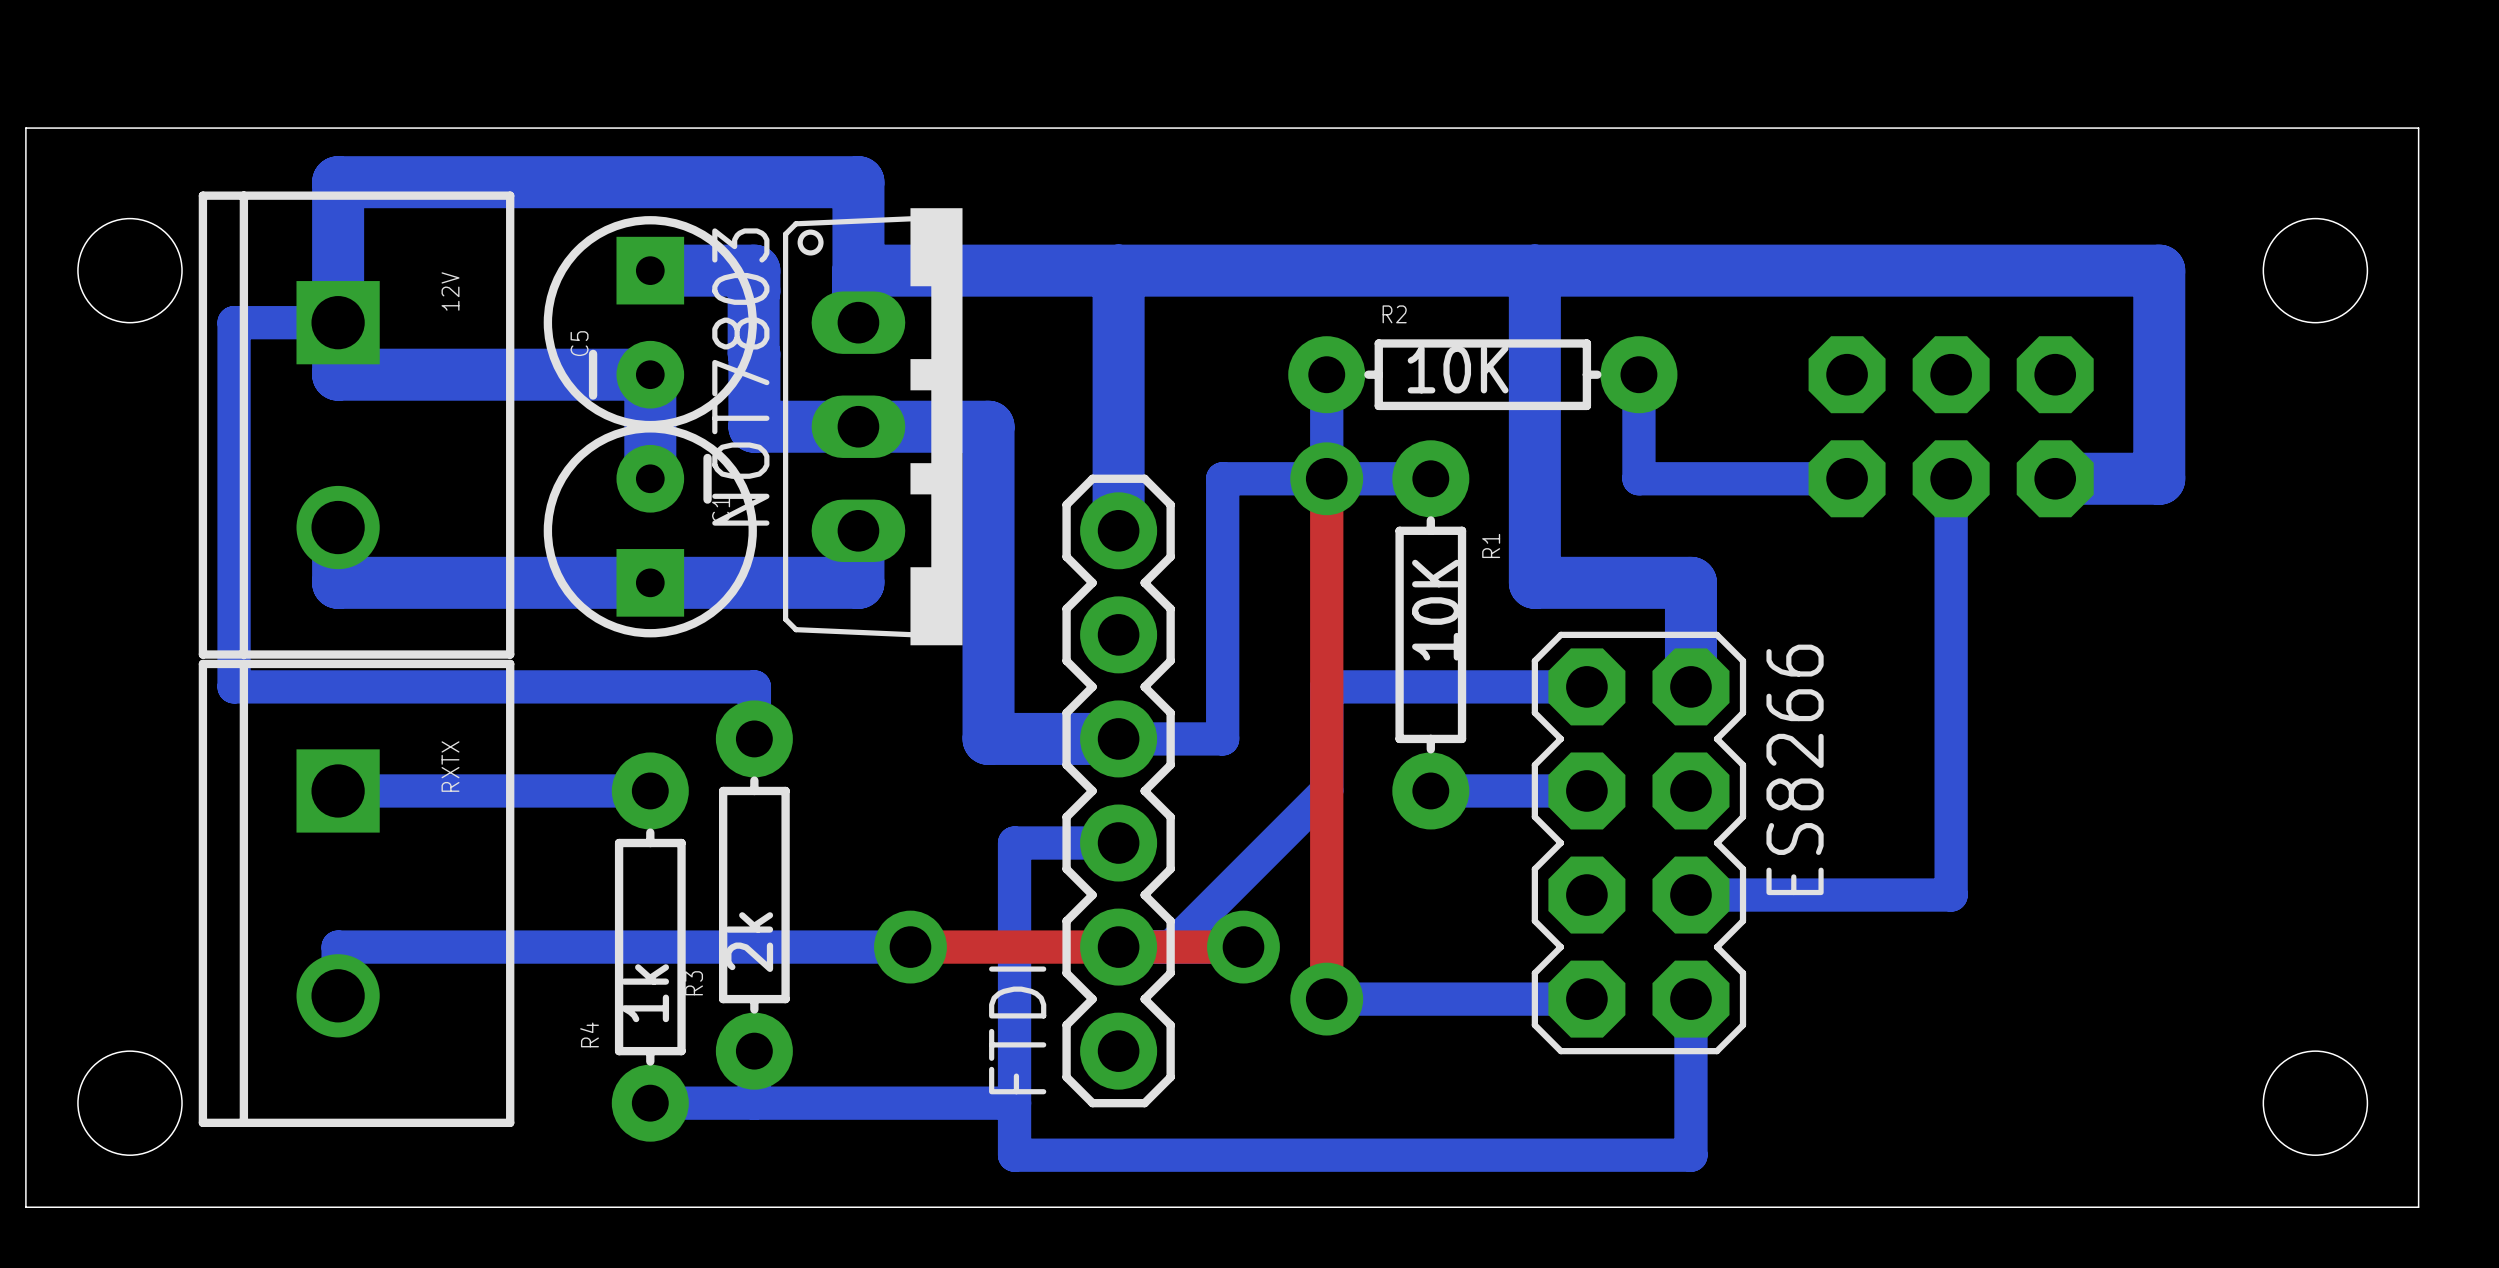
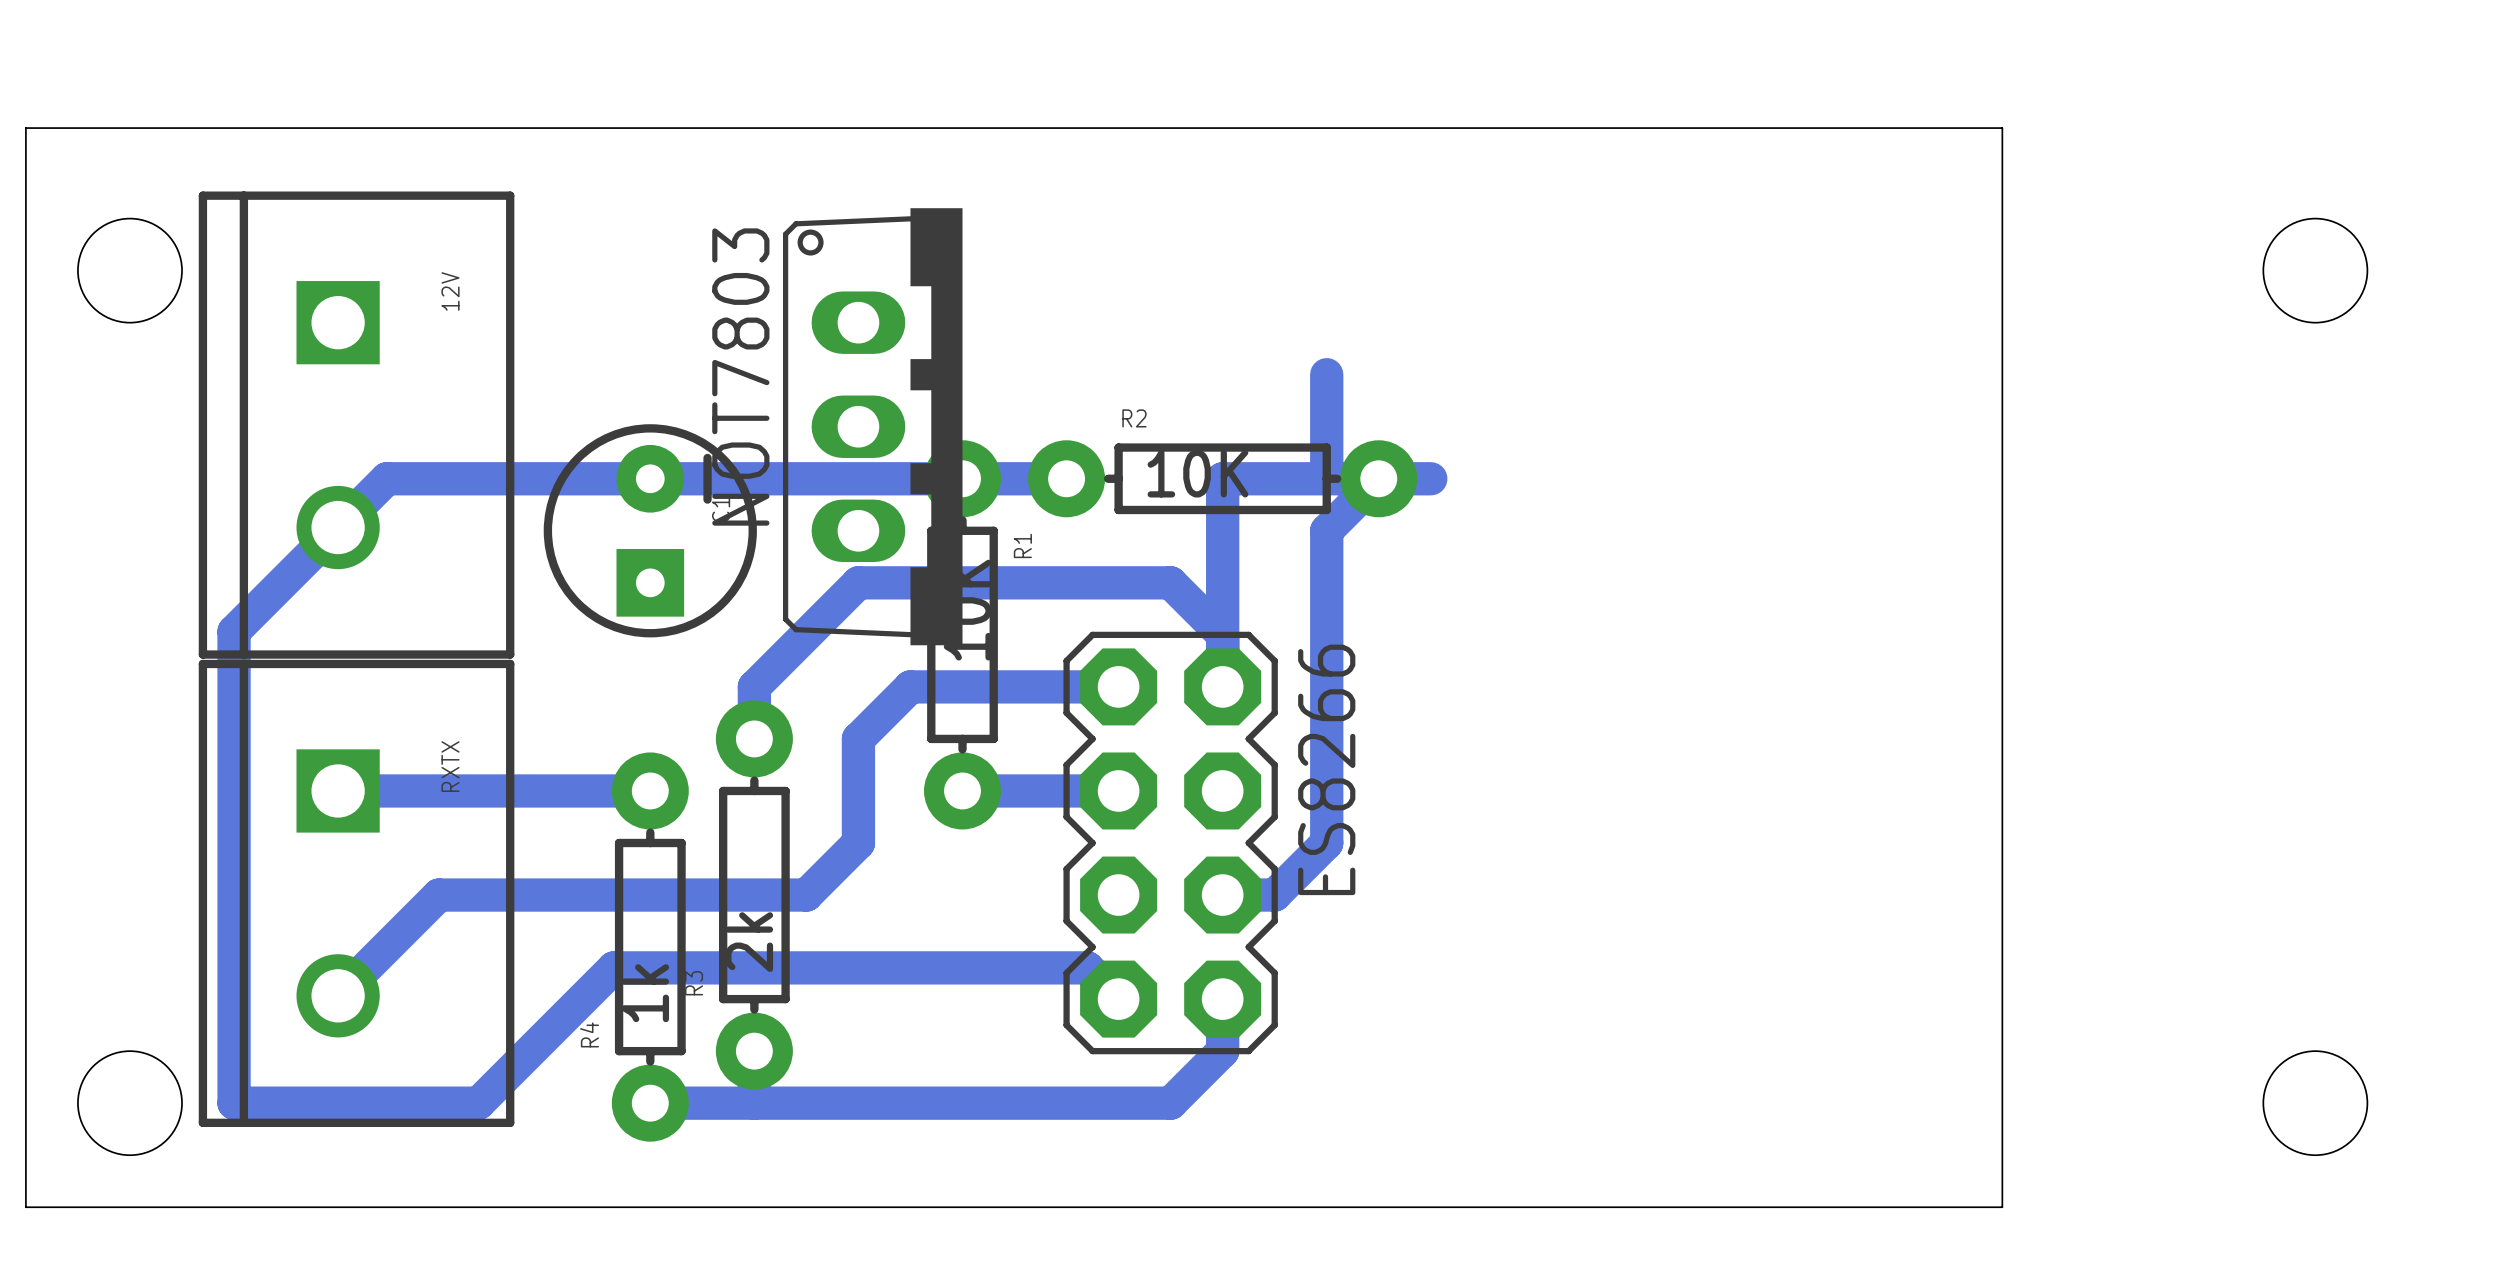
board edge: (2002, 128) (2418, 128) (2418, 1207) (2002, 1207) -> (2002, 128) (2002, 1207)
bottom track: (650, 270) (754, 270) (754, 426) (988, 426) (988, 738) (1222, 738) (1222, 686) -> none
bottom track: (858, 270) (2159, 270) (2159, 478) (2055, 478) -> none
bottom track: (1118, 270) (1118, 530) -> none
bottom track: (1534, 270) (1534, 582) (1690, 582) (1690, 686) -> none
bottom track: (338, 322) (234, 322) (234, 631) -> (1066, 478) (386, 478) (234, 631)
C5: (650, 322) -> none
bottom track: (858, 322) (858, 182) (338, 182) (338, 374) (650, 374) (650, 478) -> none
R2 position: (1482, 374) -> (1222, 478)
bottom track: (1638, 374) (1638, 478) (1847, 478) -> none
part: (1951, 426) -> none
top track: (1326, 478) (1326, 999) -> none
via: (1326, 478) -> none
bottom track: (1951, 478) (1951, 895) (1690, 895) -> none
bottom track: (338, 527) (338, 582) (858, 582) (858, 530) -> none
bottom track: none -> (1222, 634) (1170, 582) (858, 582) (754, 686)
R1 position: (1430, 634) -> (962, 634)
bottom track: (234, 686) (754, 686) -> (234, 686) (234, 1103) (478, 1103) (613, 967) (1087, 967) (1118, 999)
bottom track: (1326, 686) (1586, 686) -> (1326, 686) (1326, 530) (1378, 478)
FTDI: (1118, 790) -> none
bottom track: (1326, 790) (1170, 947) -> (1326, 790) (1326, 843) (1274, 895) (1222, 895)
bottom track: (1430, 790) (1586, 790) -> (962, 790) (1118, 790)
bottom track: (1118, 843) (1014, 843) (1014, 1155) (1690, 1155) (1690, 999) -> none
ES8266 position: (1638, 843) -> (1170, 843)
bottom track: (910, 947) (338, 947) (338, 995) -> (1118, 686) (910, 686) (858, 738) (858, 843) (806, 895) (438, 895) (338, 995)
top track: (910, 947) (1243, 947) -> none
via: (910, 947) -> none
via: (1243, 947) -> none
bottom track: none -> (1222, 999) (1222, 1051) (1170, 1103) (1014, 1103)
bottom track: (1326, 999) (1586, 999) -> none
via: (1326, 999) -> none

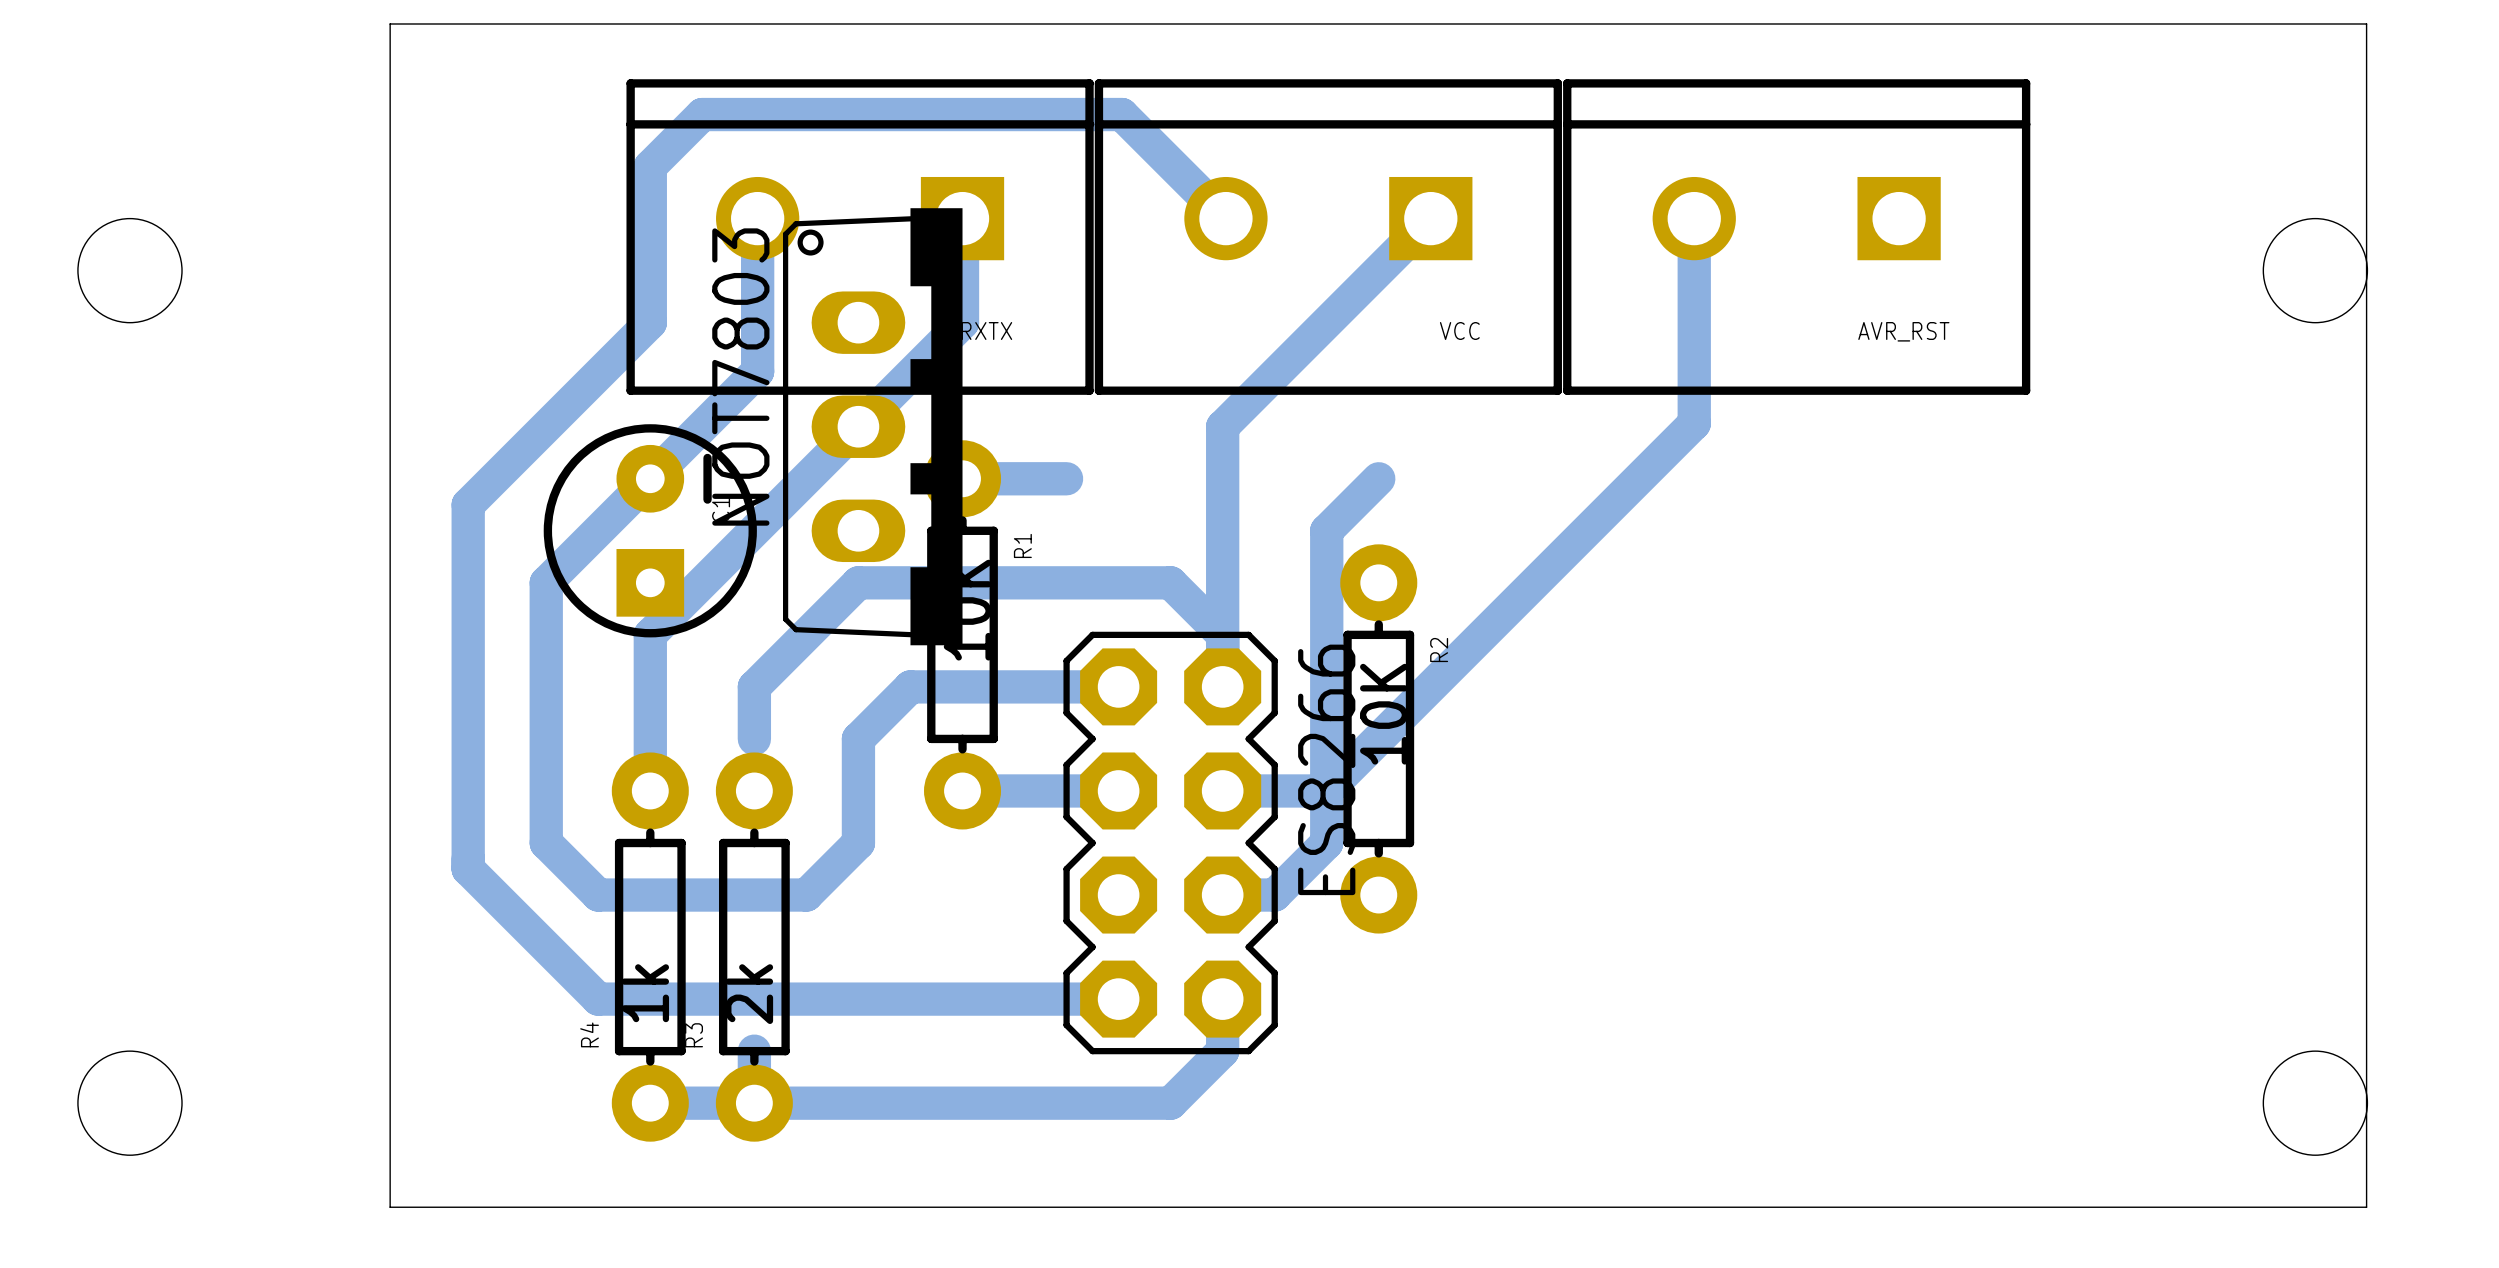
bottom track: none -> (1225, 218) (1121, 114) (702, 114) (650, 166) (650, 322) (468, 504) (468, 869)
bottom track: none -> (1694, 218) (1694, 423) (1326, 790) (1222, 790)
VCC: none -> (1328, 237)
AVR_RST: none -> (1796, 237)
bottom track: (1326, 374) (1326, 478) -> none
12V: (356, 425) -> none
bottom track: (962, 478) (386, 478) (234, 631) (234, 1103) (478, 1103) (613, 967) (1087, 967) (1118, 999) -> (468, 869) (598, 999) (1118, 999)
bottom track: (1222, 478) (1430, 478) -> (1222, 478) (1222, 426) (1430, 218)
R2 rotation: 0° (1222, 478) -> 90° clockwise (1378, 738)
R2 position: (1222, 478) -> (1378, 738)
bottom track: (338, 790) (650, 790) -> (962, 218) (962, 322) (650, 634) (650, 790)
RXTX rotation: 0° (356, 893) -> 90° clockwise (860, 237)
RXTX position: (356, 893) -> (860, 237)
bottom track: (598, 895) (438, 895) (338, 995) -> (598, 895) (546, 843) (546, 582) (757, 371) (757, 218)
R3 position: (754, 895) -> (754, 947)
board edge: (390, 1207) (25, 1207) (25, 128) (2002, 128) (2002, 1207) -> (390, 1207) (390, 23) (2366, 23) (2366, 1207) (2002, 1207)

